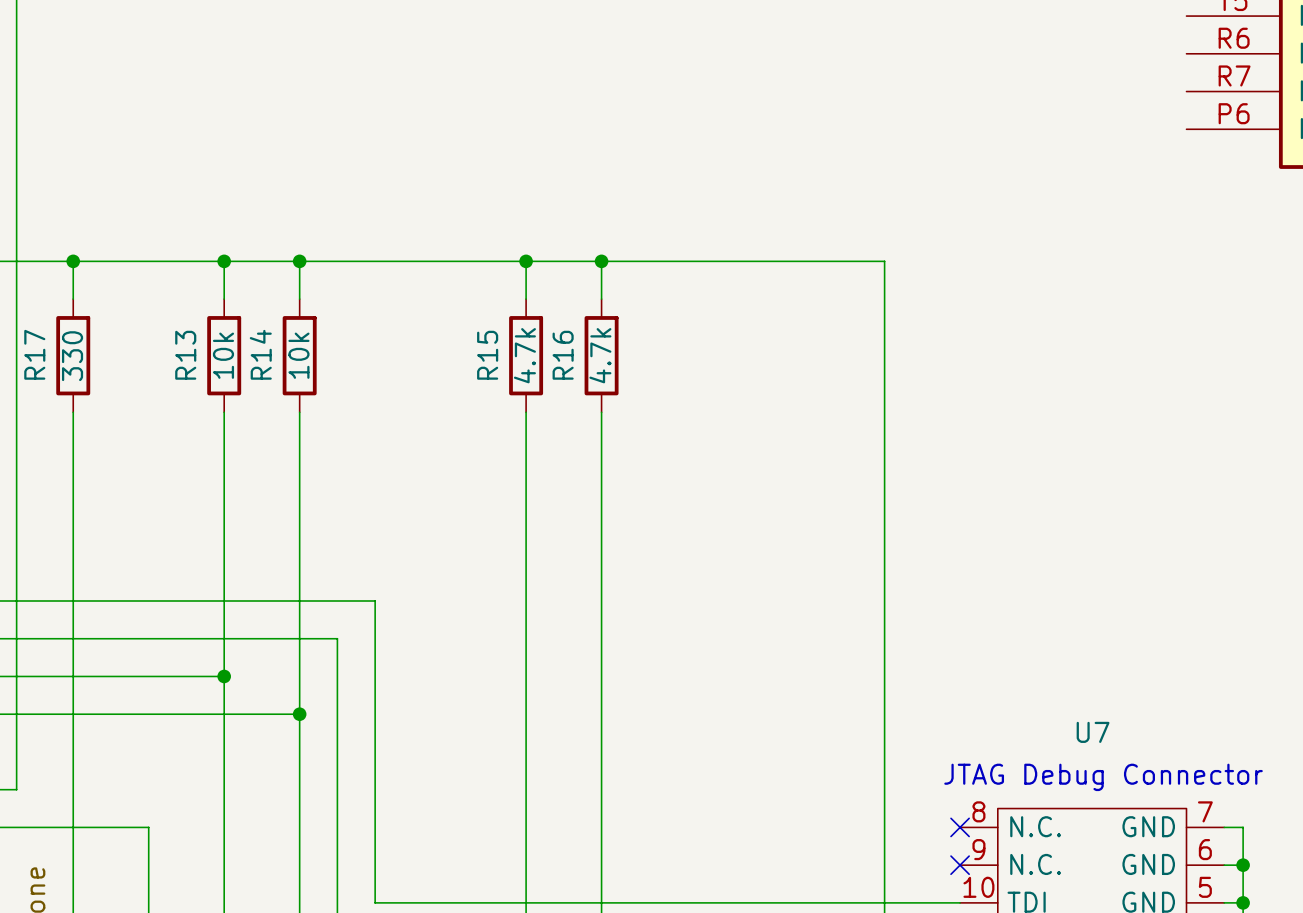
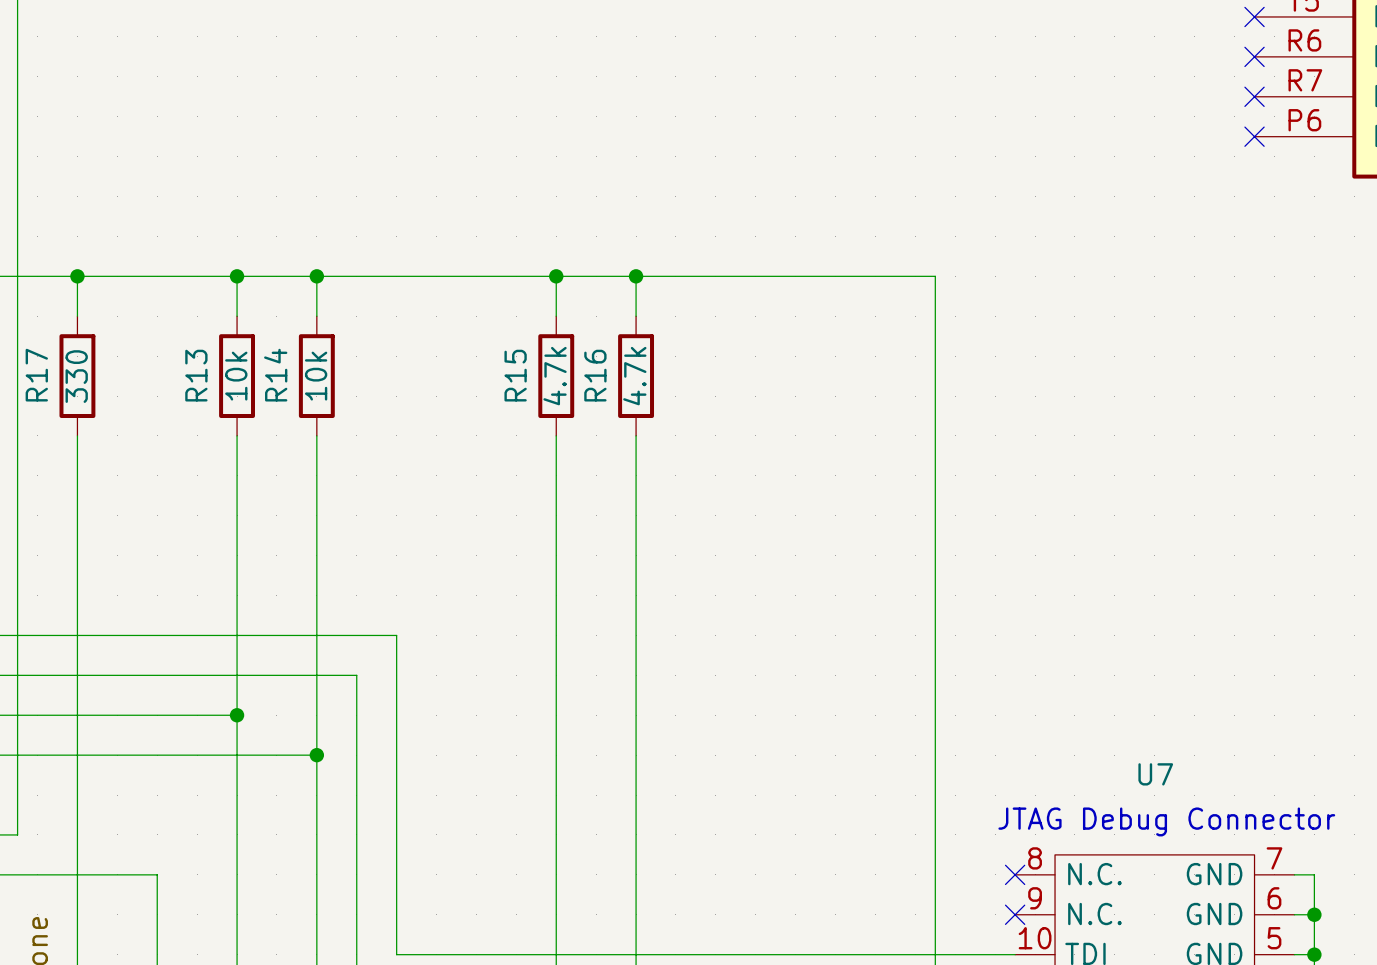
no-connect mark: none -> (1254, 16)
no-connect mark: none -> (1254, 56)
no-connect mark: none -> (1254, 96)
no-connect mark: none -> (1254, 136)

